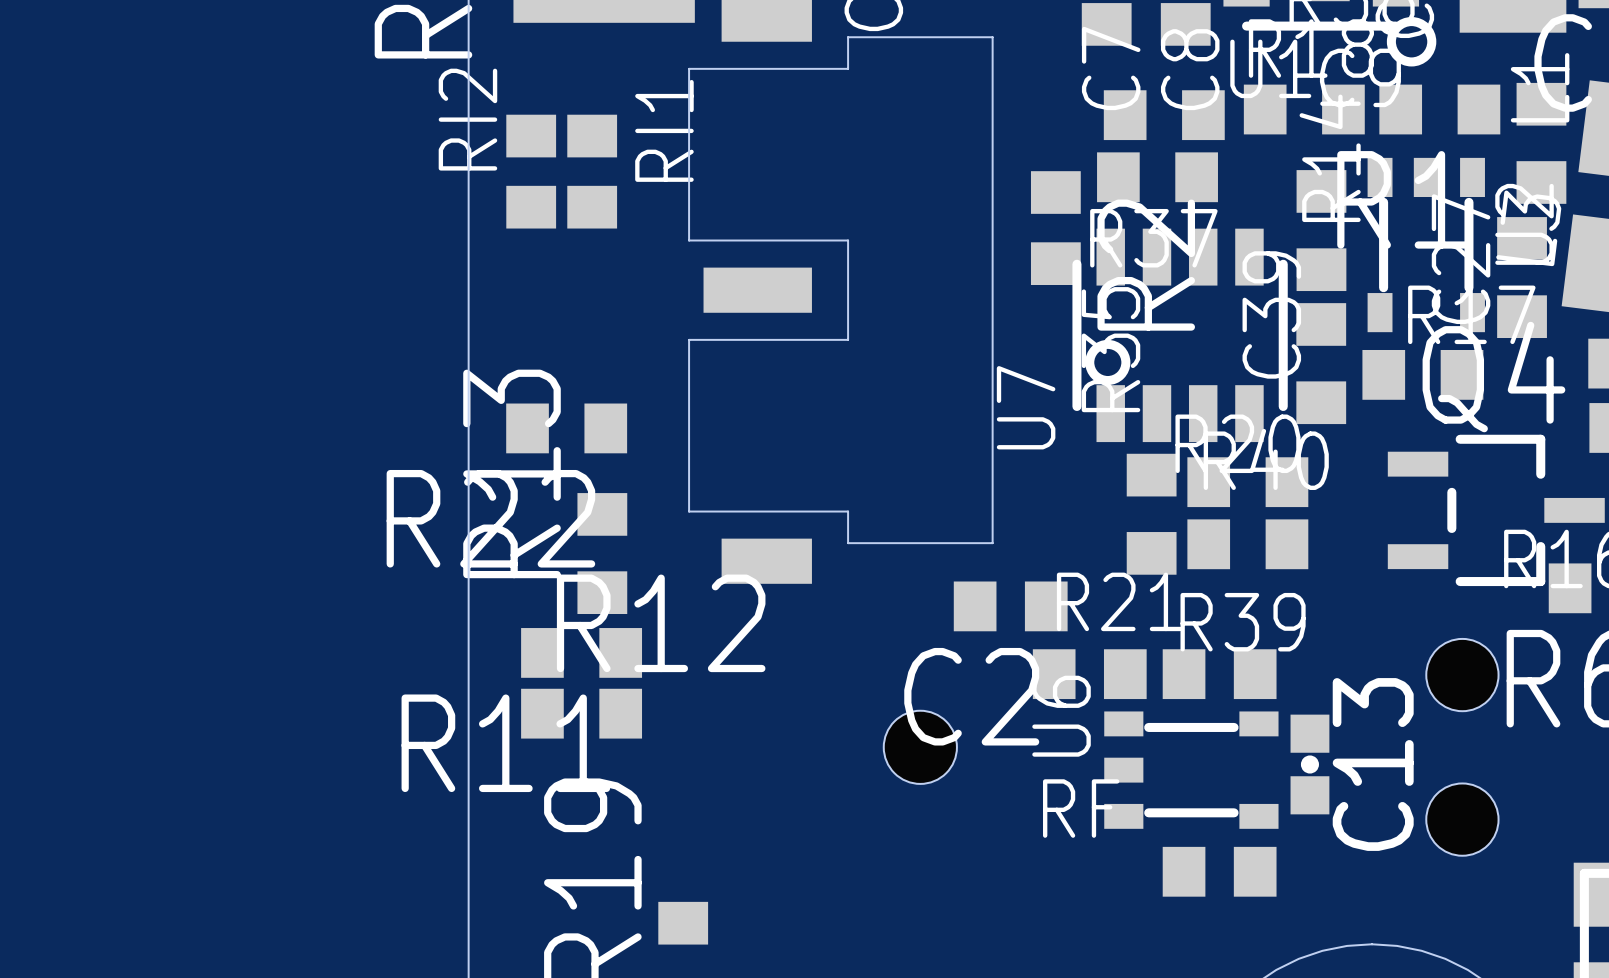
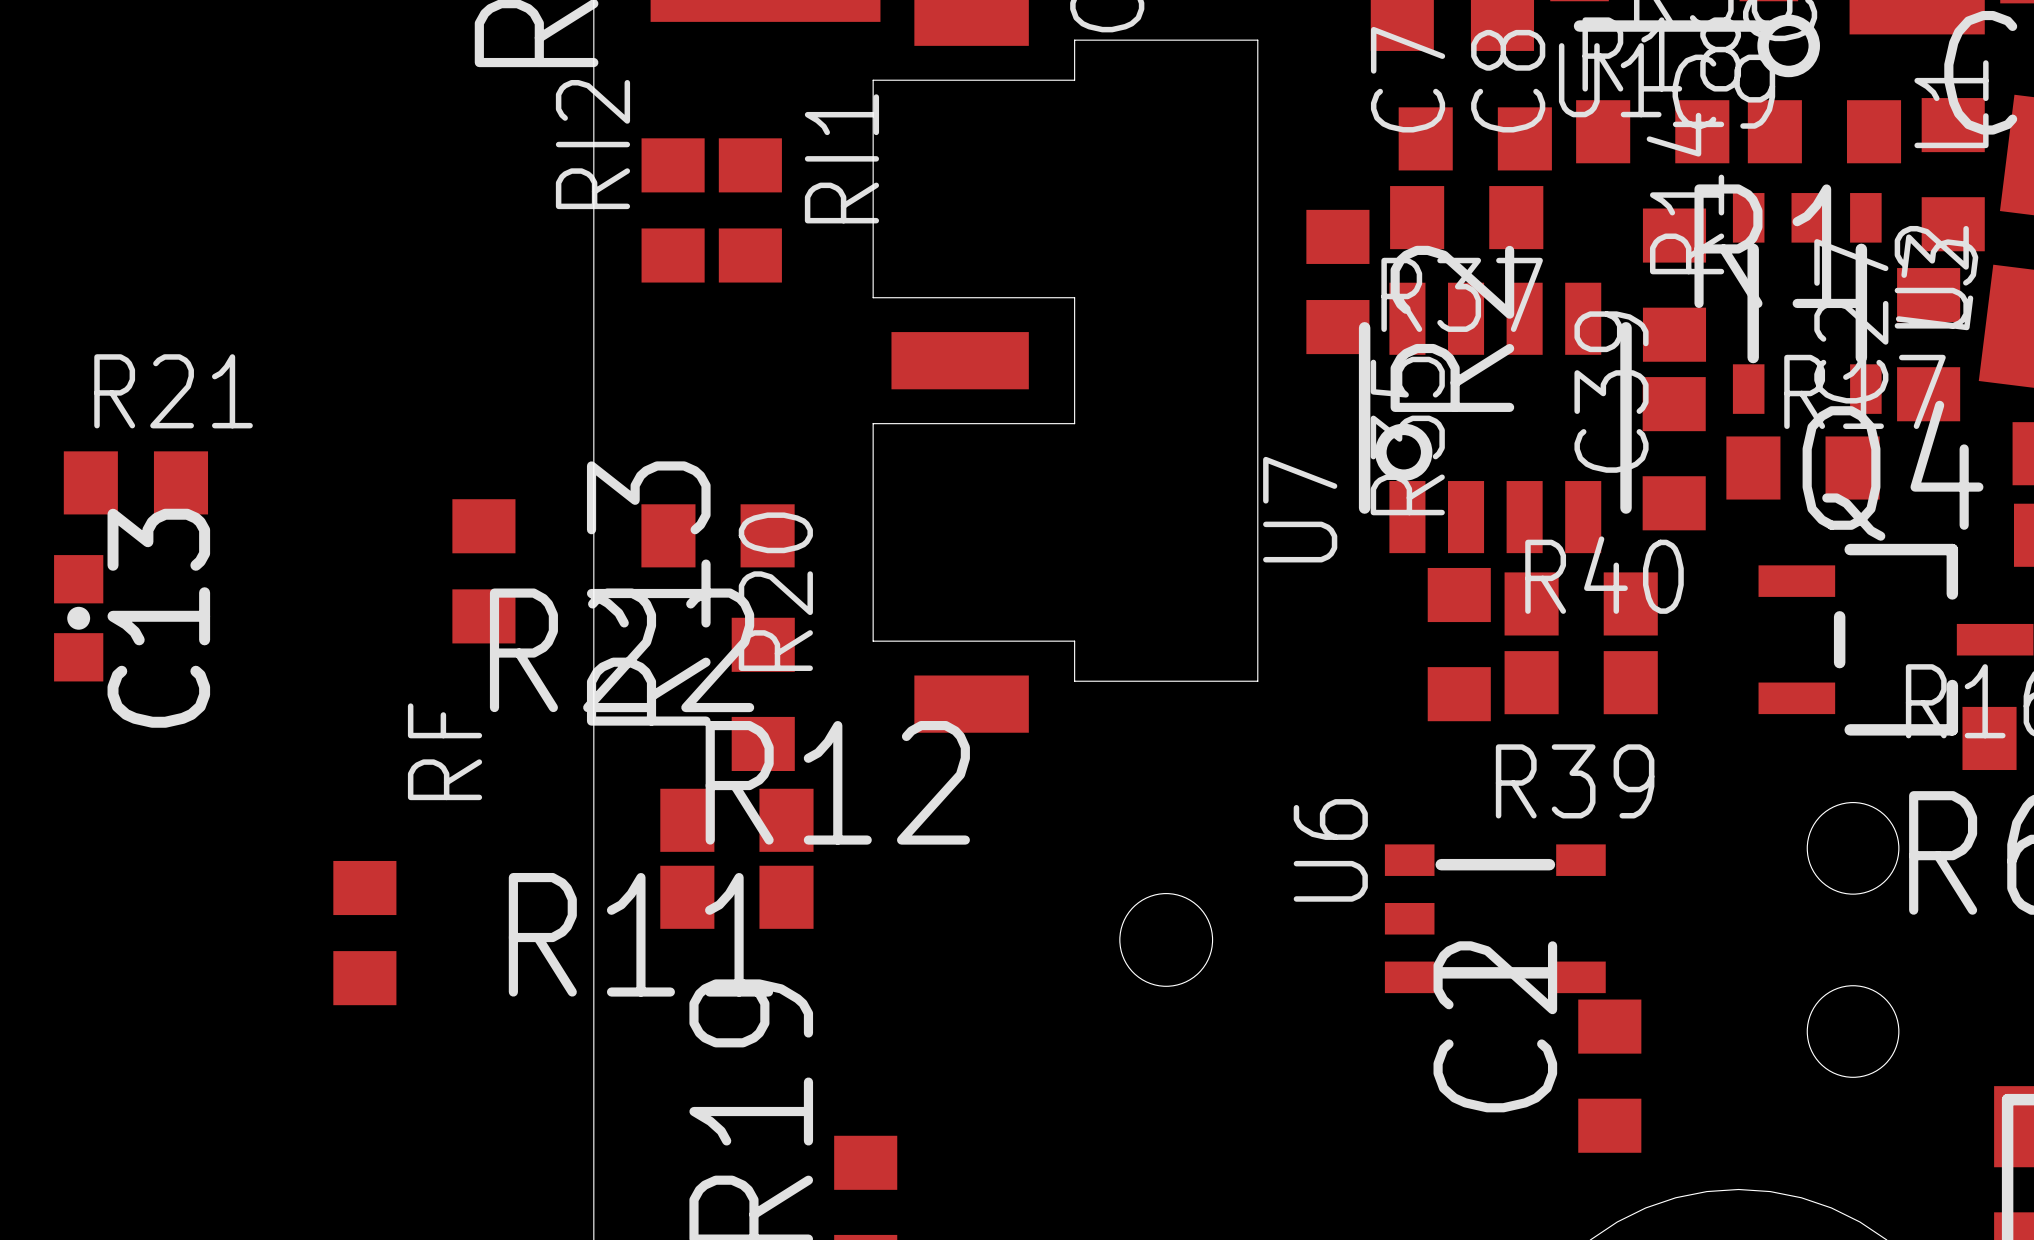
C2 footprint: [953, 581, 1068, 632] -> [1578, 999, 1642, 1153]
R21 position: (1089, 674) -> (135, 482)
R20 rotation: 0° (1219, 674) -> 90° clockwise (483, 571)
R20 position: (1219, 674) -> (483, 571)
C2 name position: C2 (971, 696) -> C2 (1495, 1026)
C13 position: (1309, 764) -> (78, 618)
U6 position: (1191, 770) -> (1495, 918)
RF rotation: 0° (1219, 871) -> 90° clockwise (364, 933)
RF position: (1219, 871) -> (364, 933)

